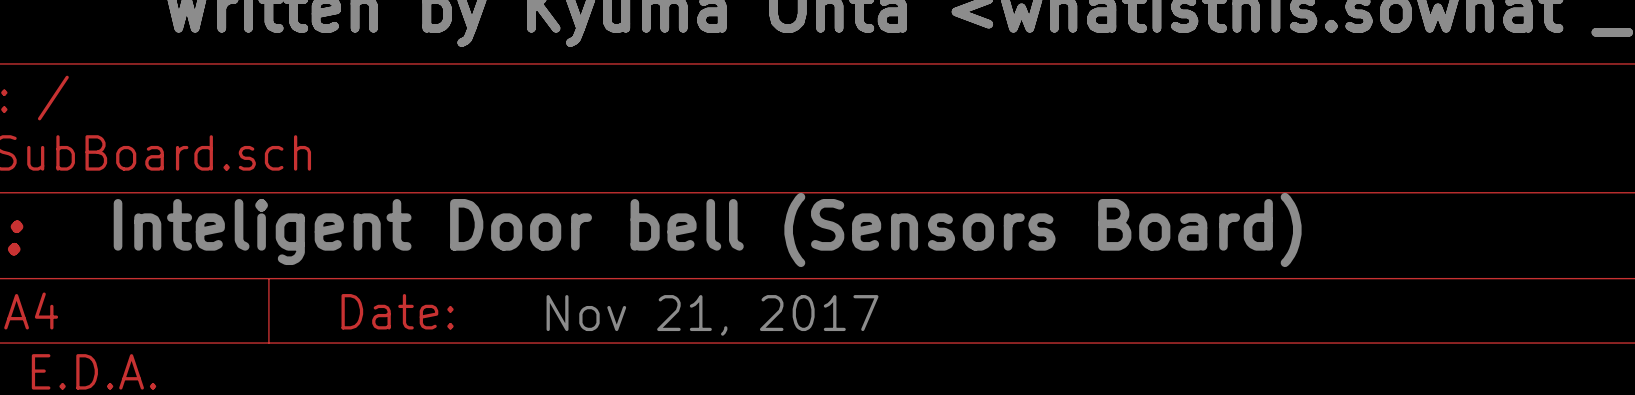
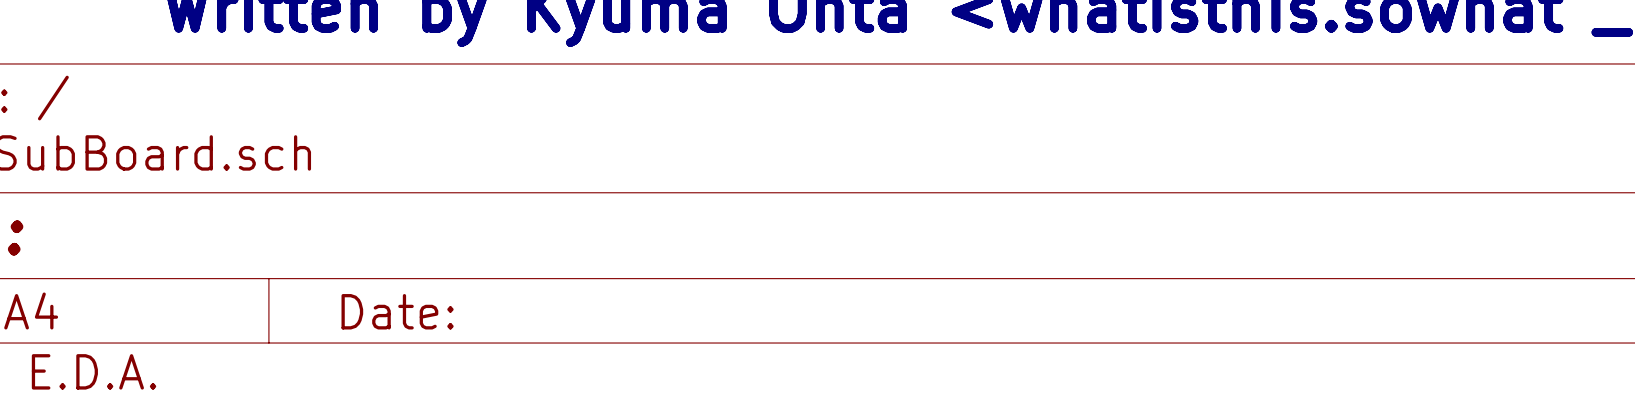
text: Inteligent Door bell (Sensors Board) (707, 229) -> none
text: Nov 21, 2017 (712, 315) -> none

